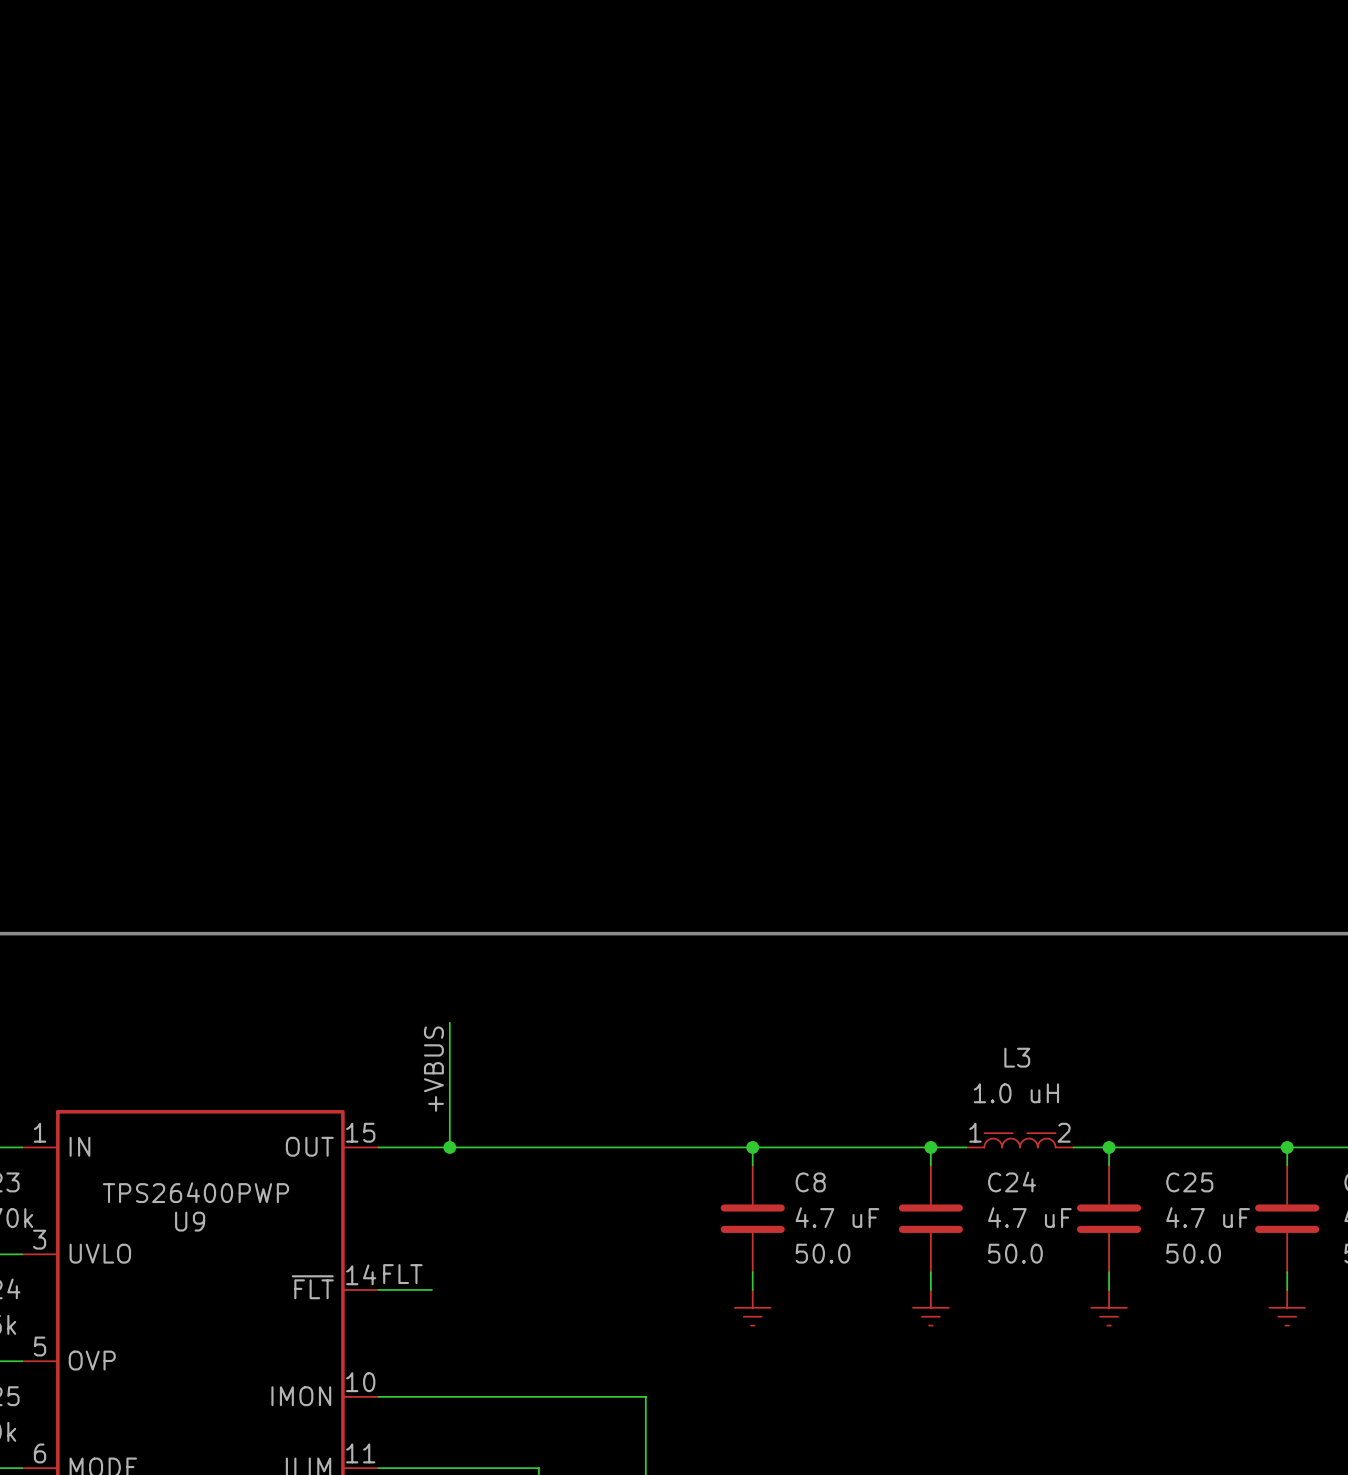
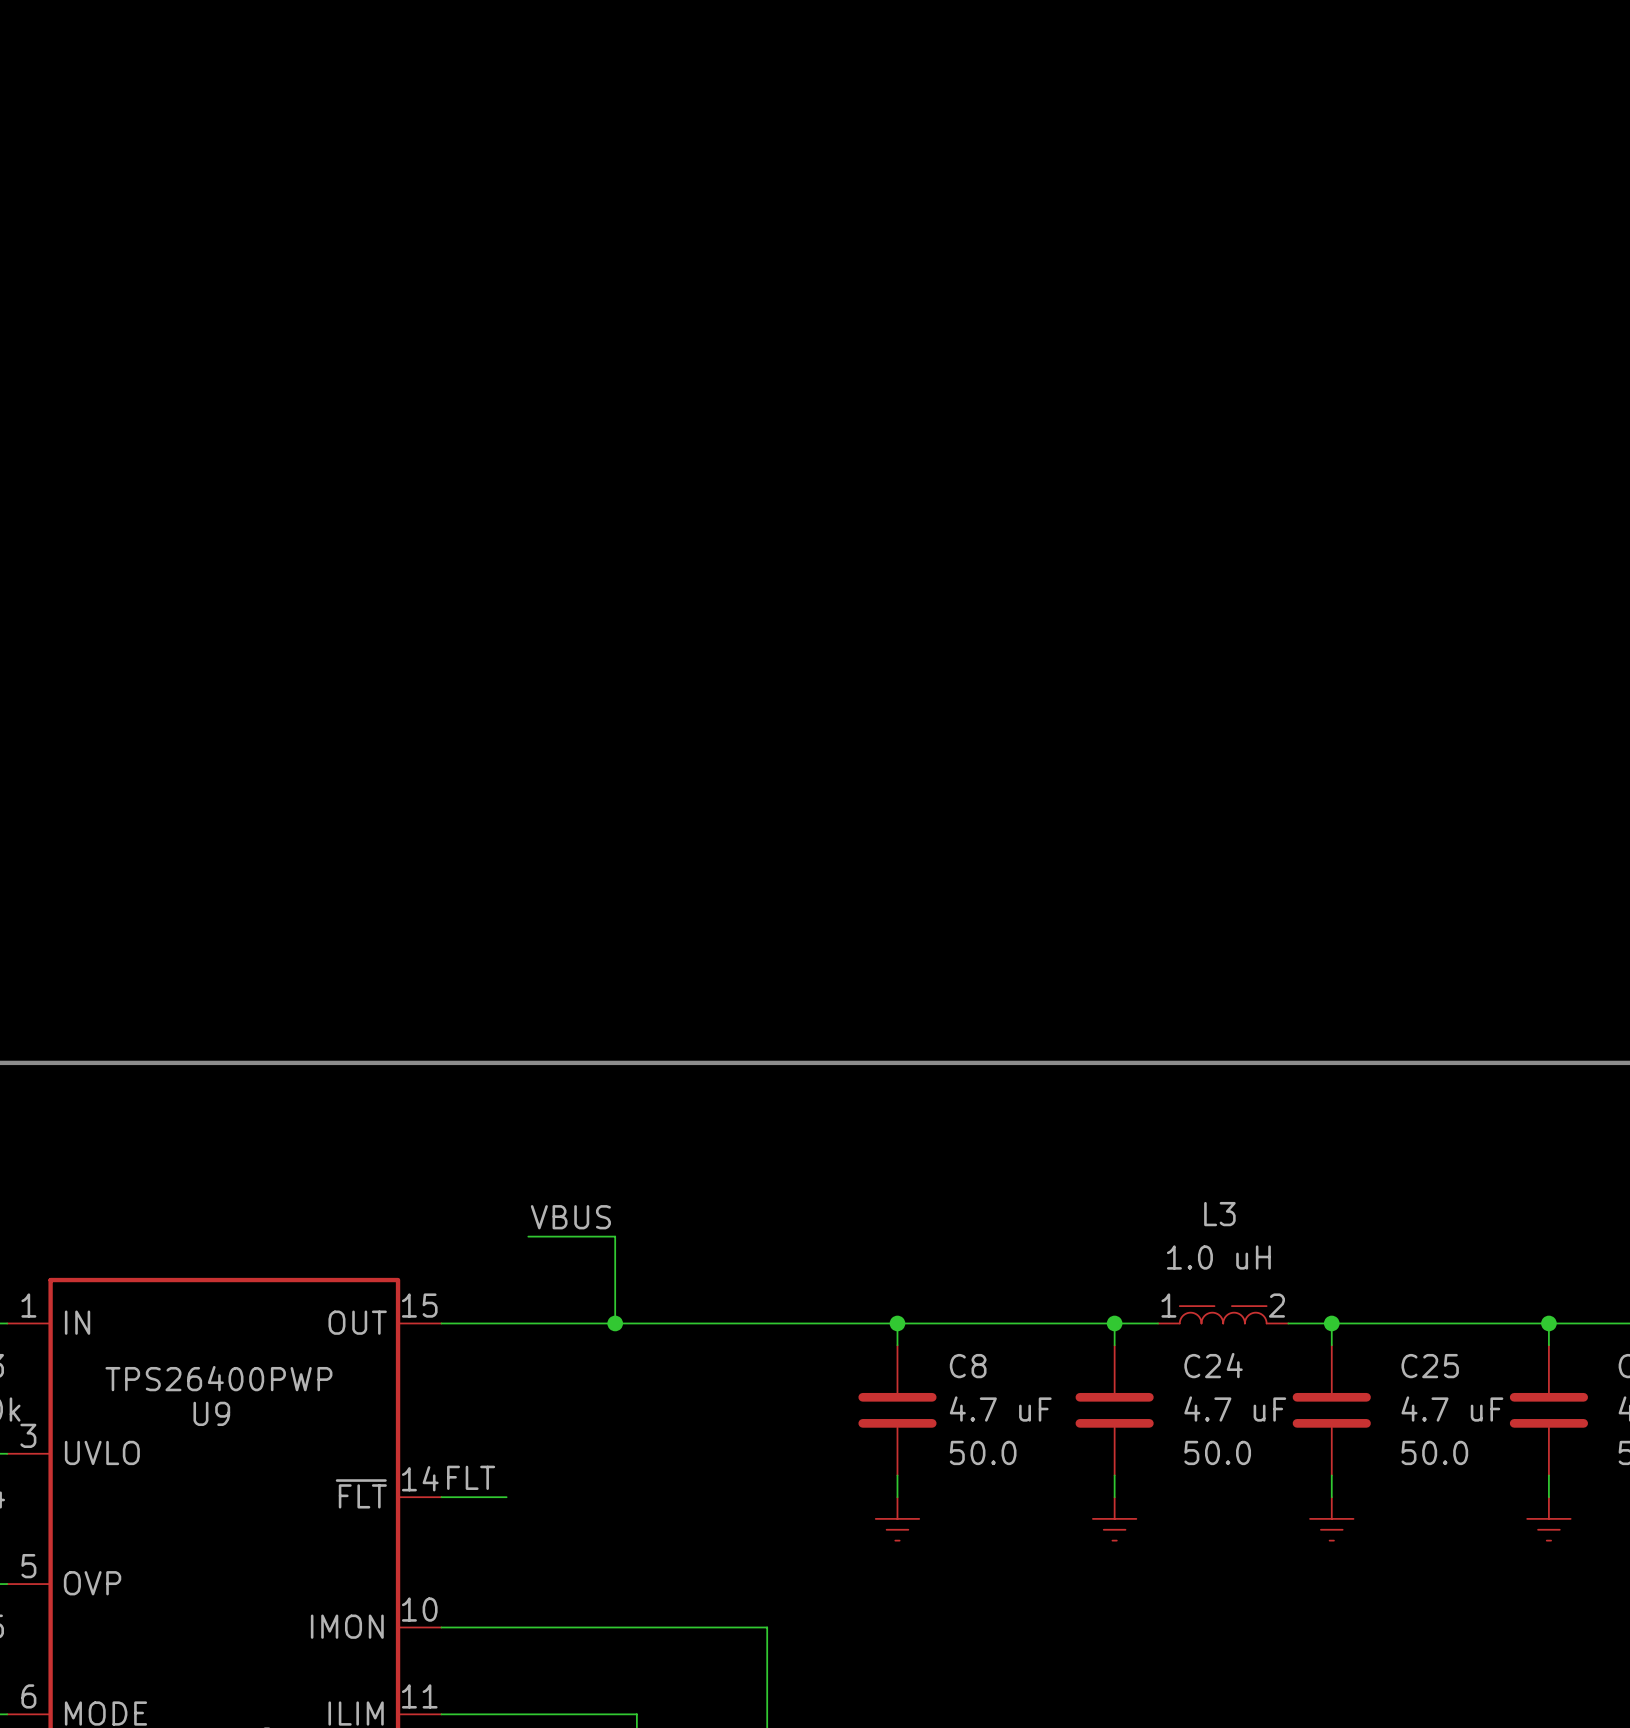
wire: (449, 1022) (449, 1147) -> none
label: +VBUS (433, 1069) -> VBUS (570, 1217)
wire: none -> (528, 1236) (615, 1236) (615, 1323)
junction position: (449, 1147) -> (615, 1323)

